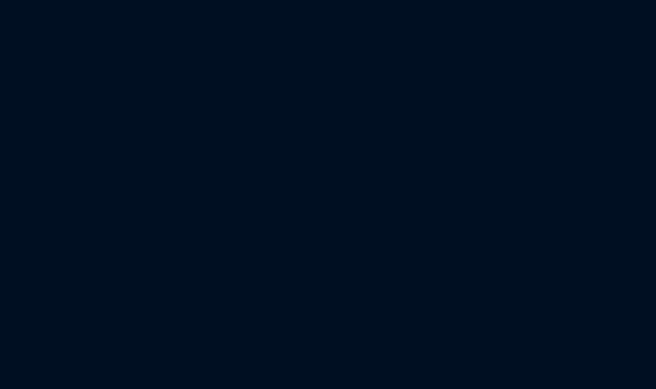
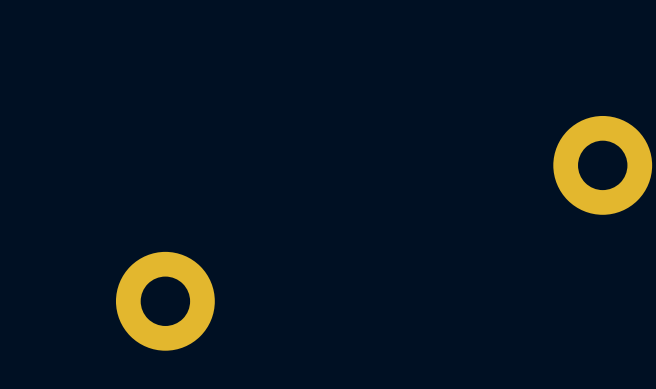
part: none -> (602, 165)
part: none -> (165, 301)

